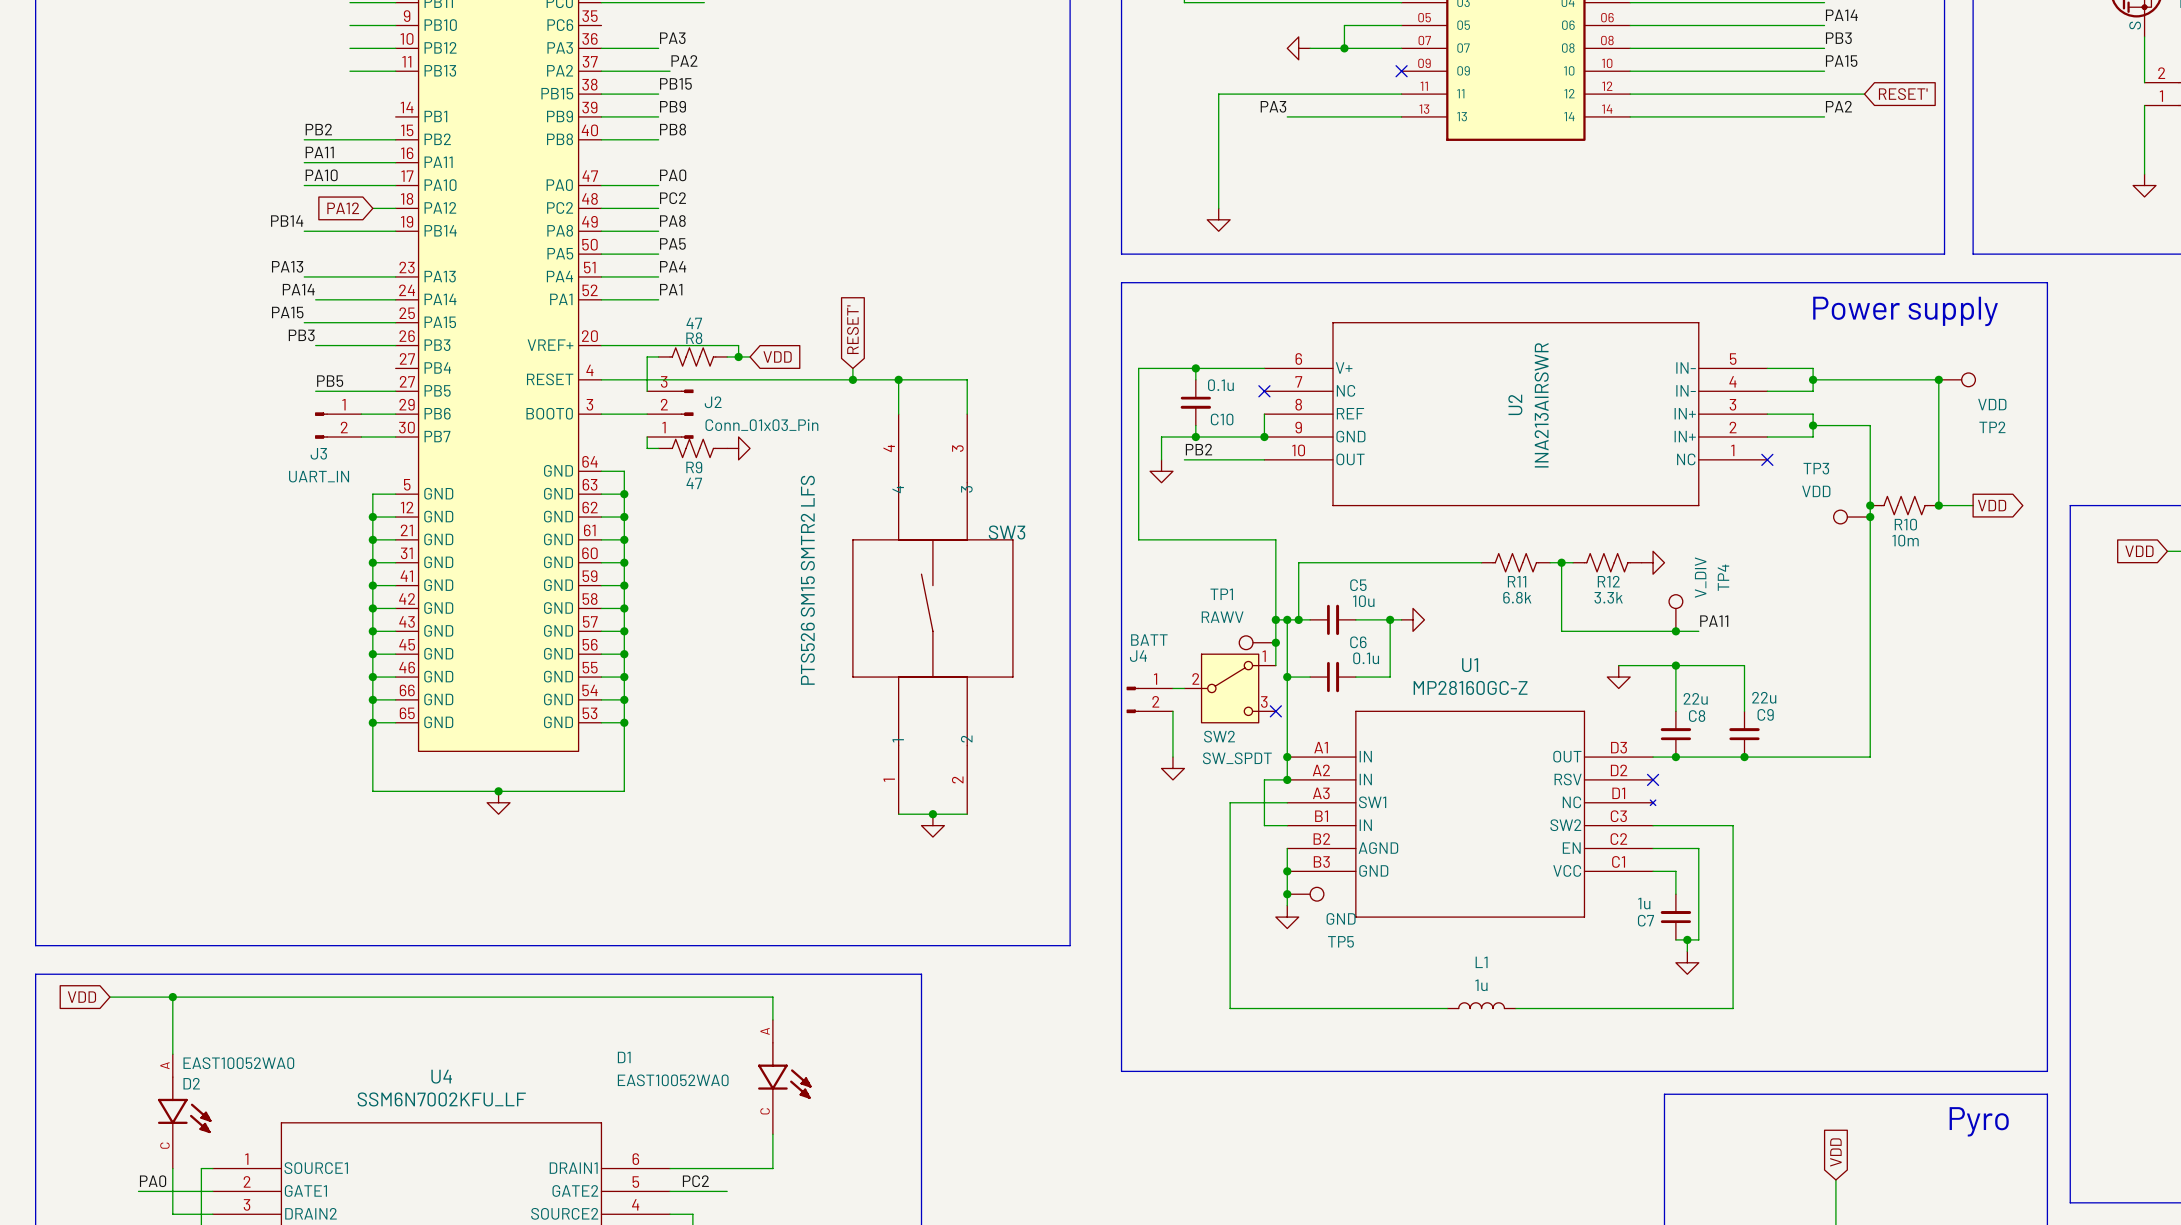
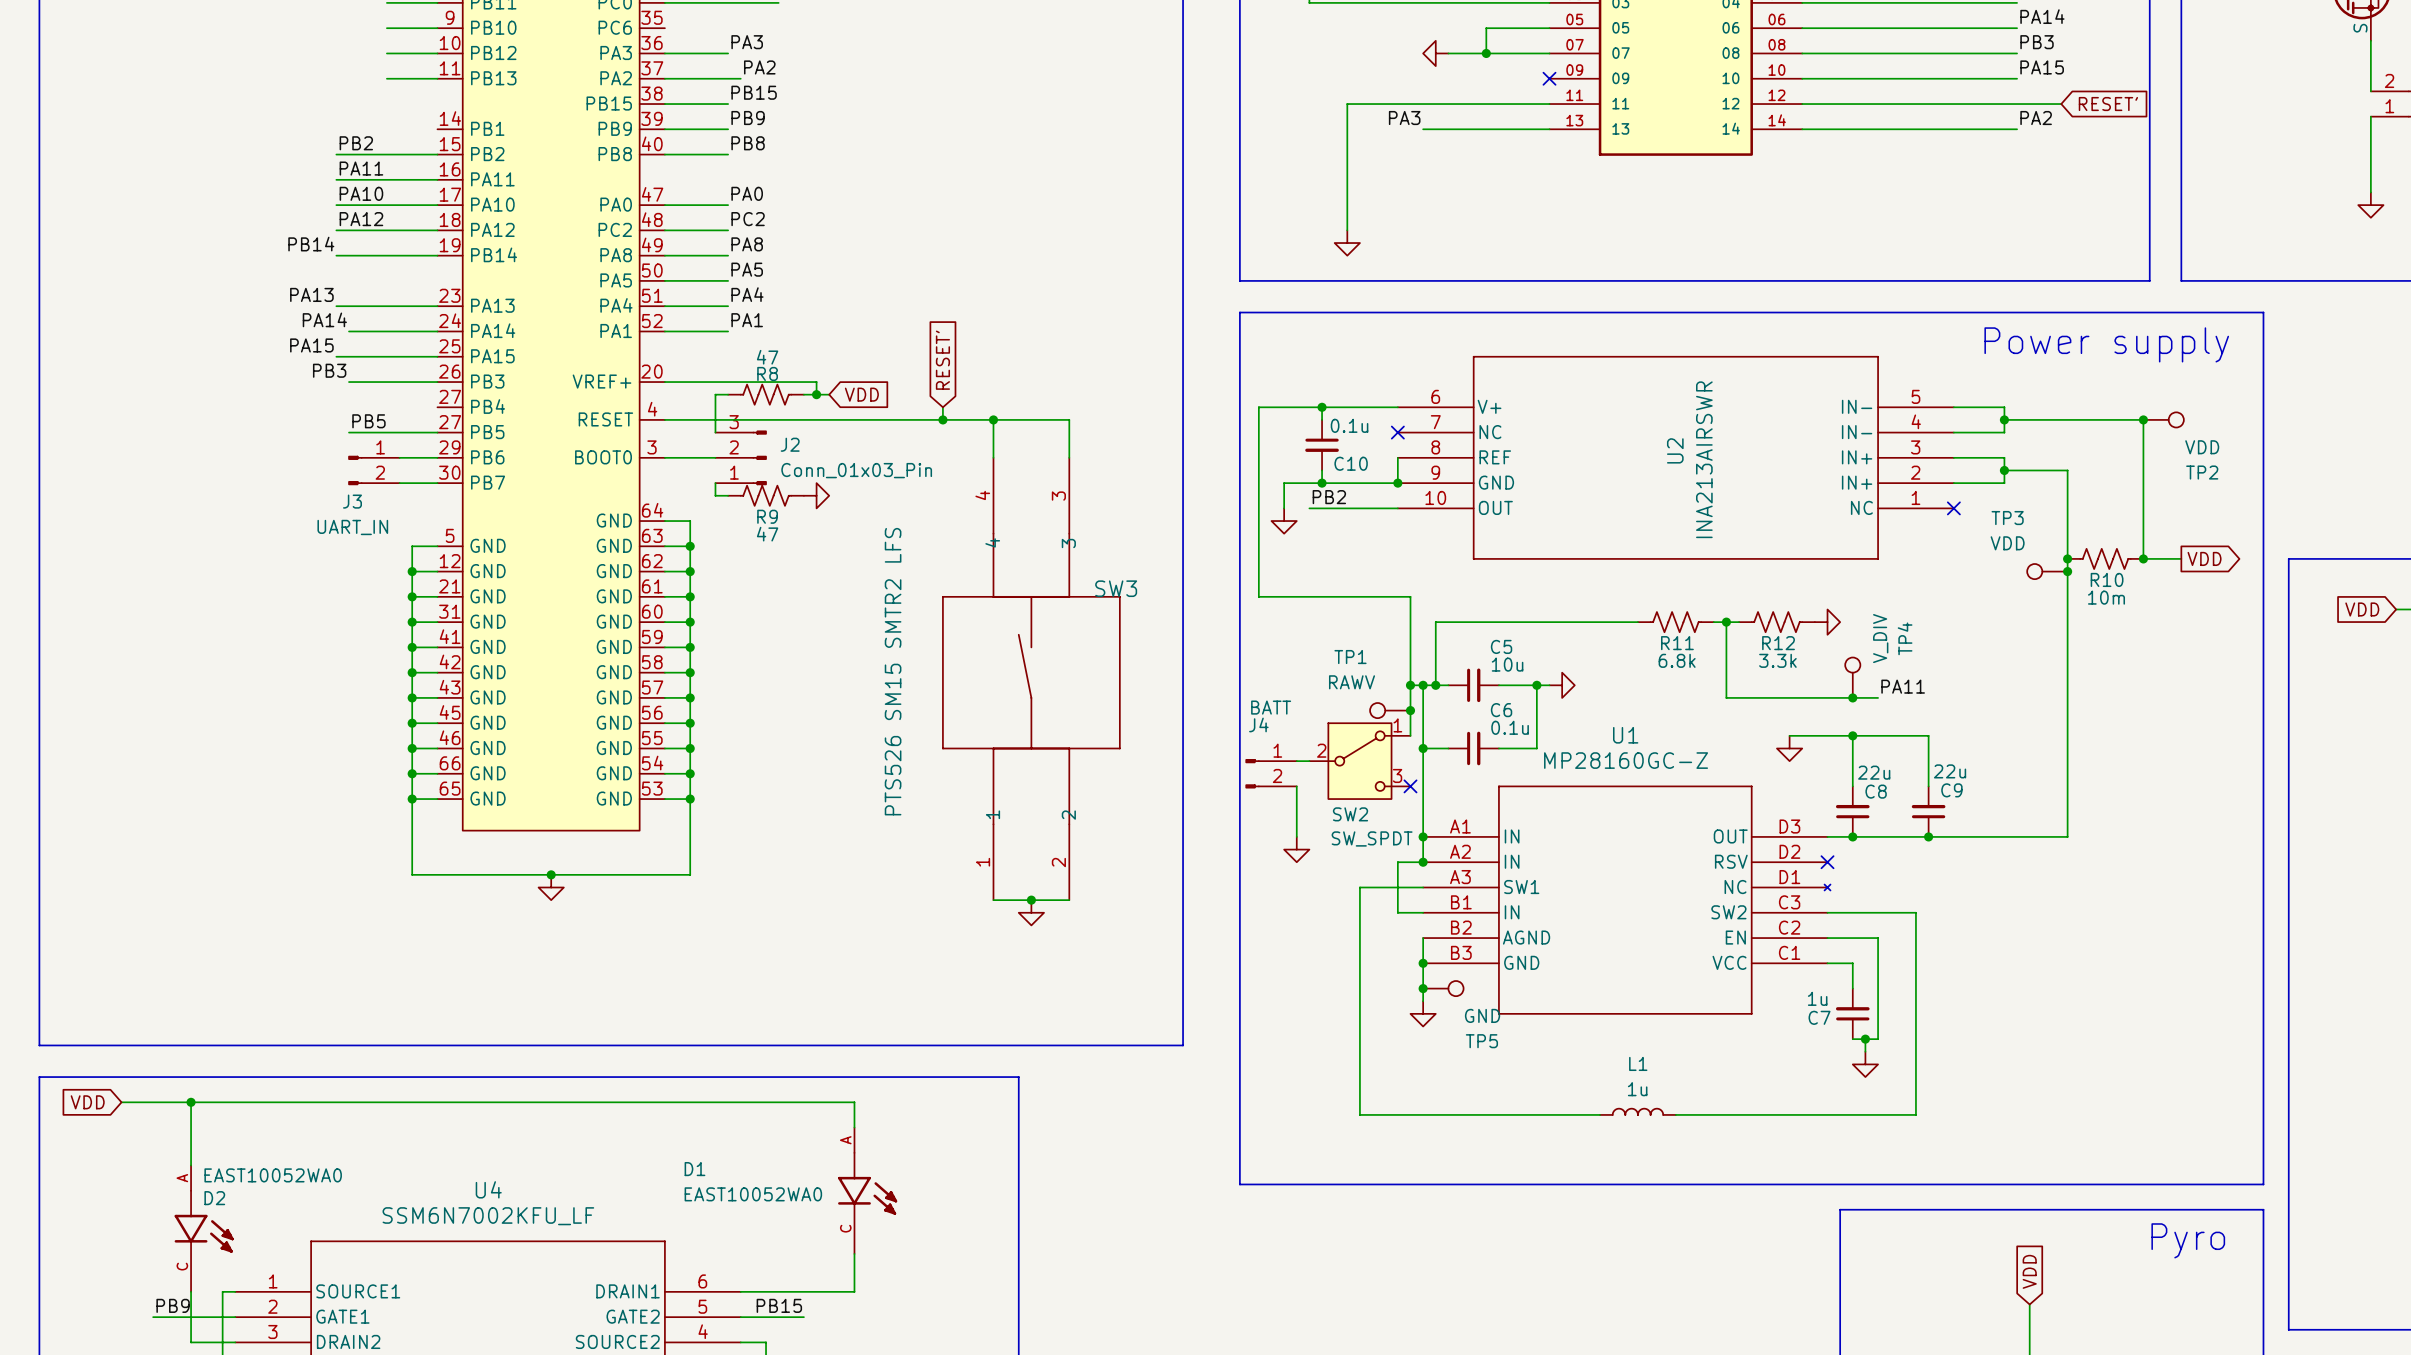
label: none -> PA12 (361, 219)
wire: none -> (336, 230) (412, 230)
global label: PA12 (343, 208) -> none
label: PA0 (153, 1181) -> PB9 (173, 1305)
label: PC2 (695, 1181) -> PB15 (779, 1305)

